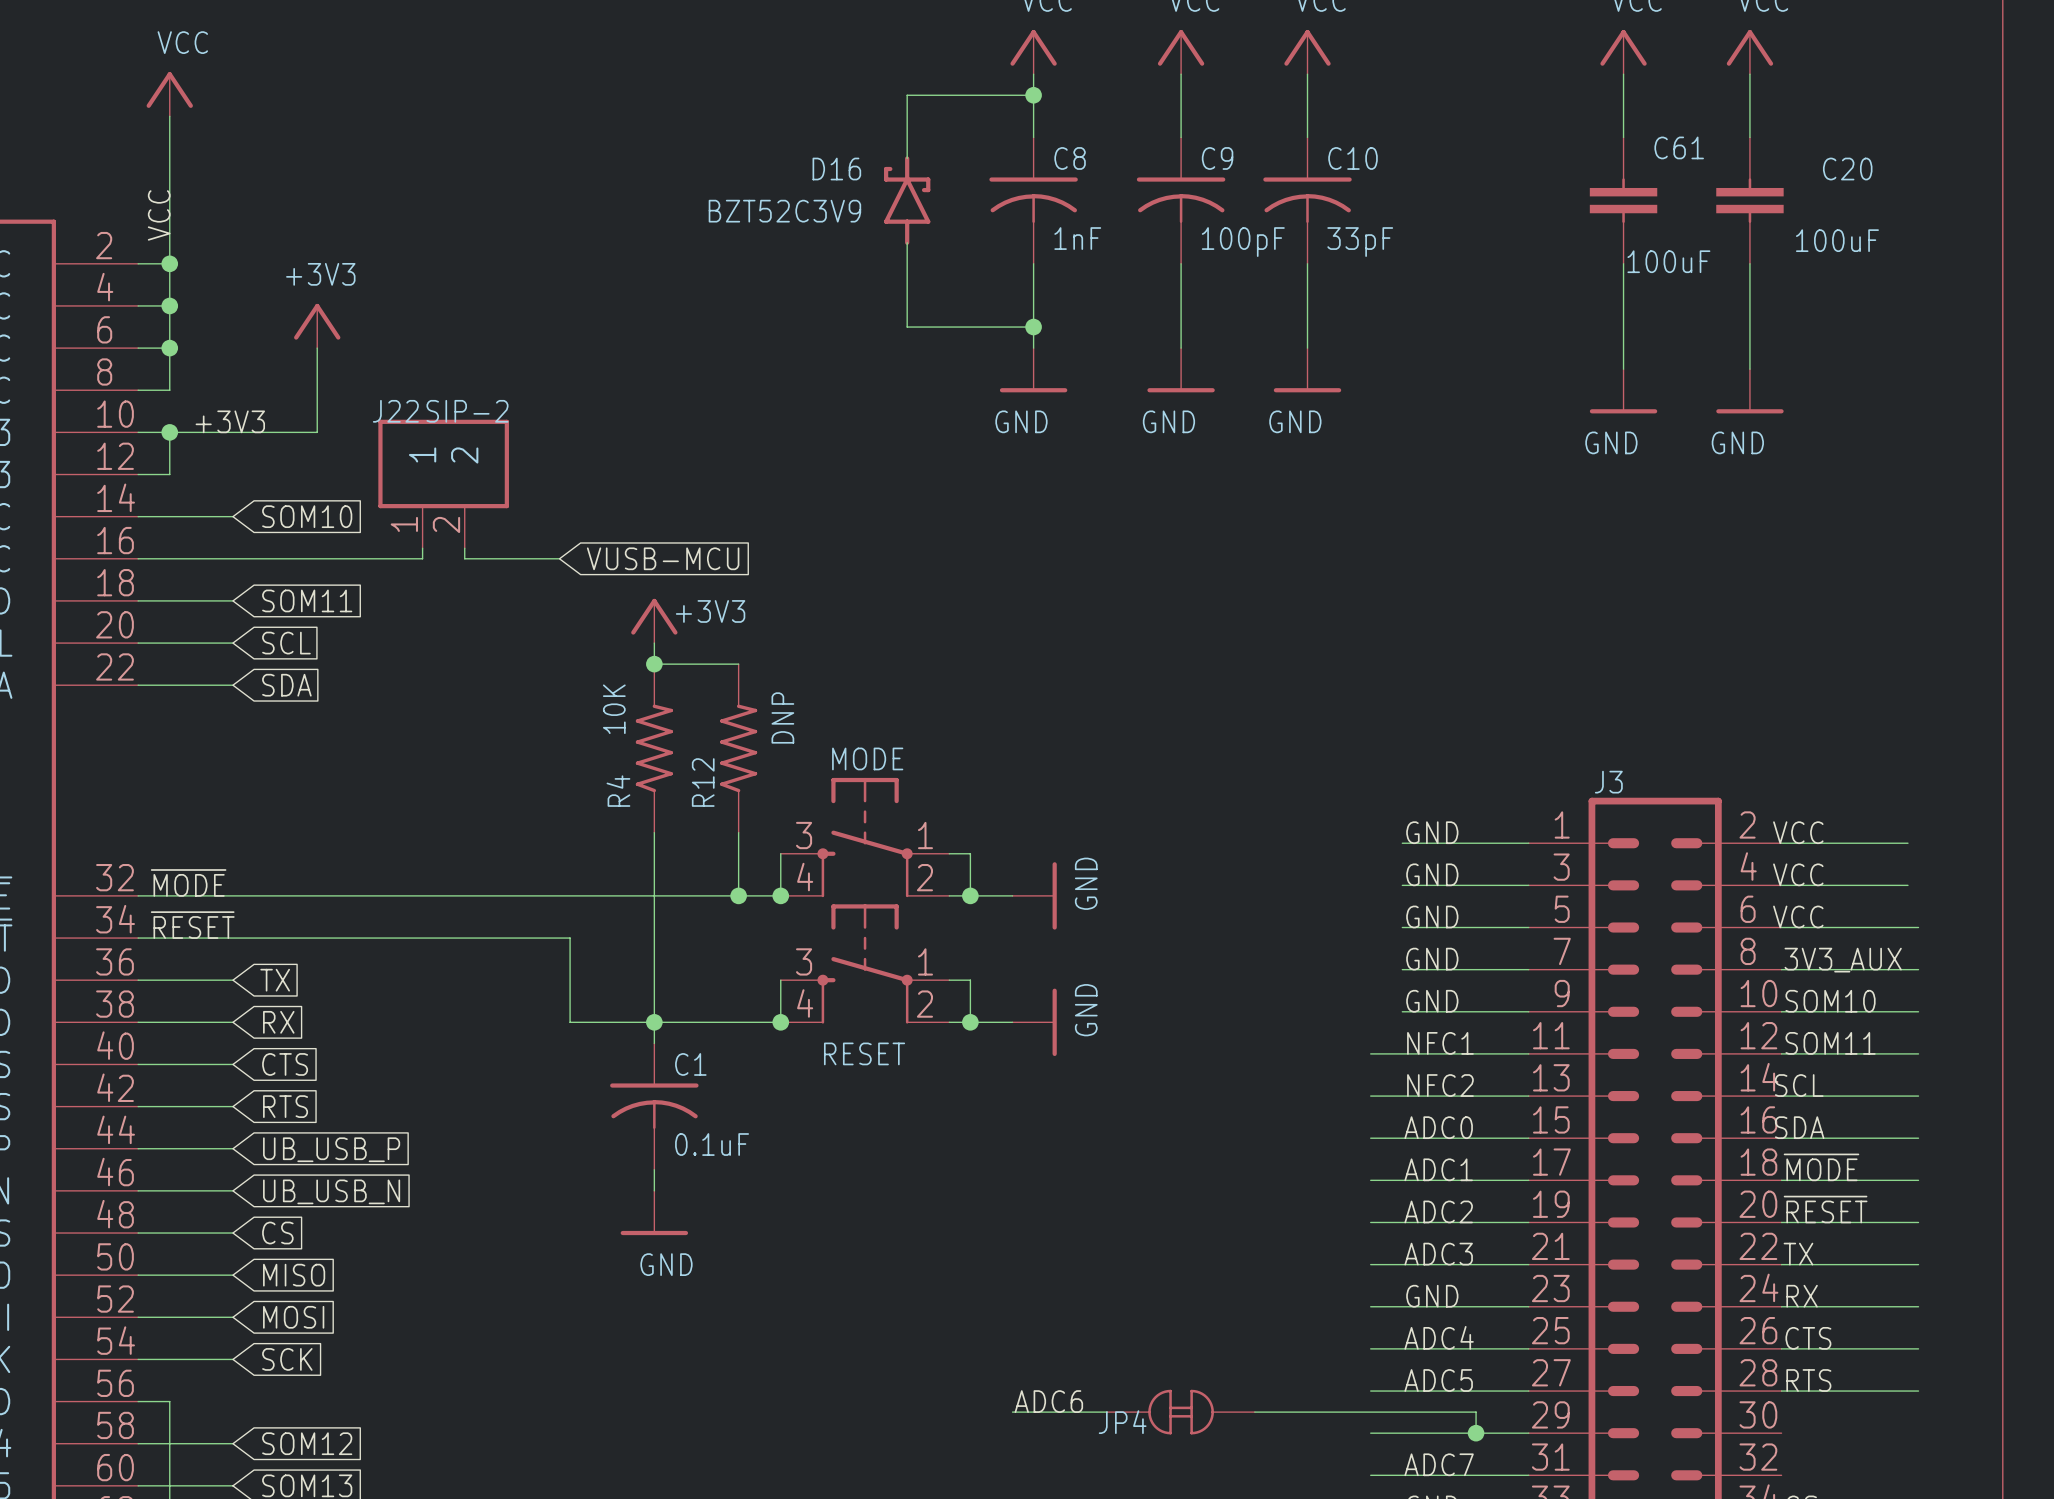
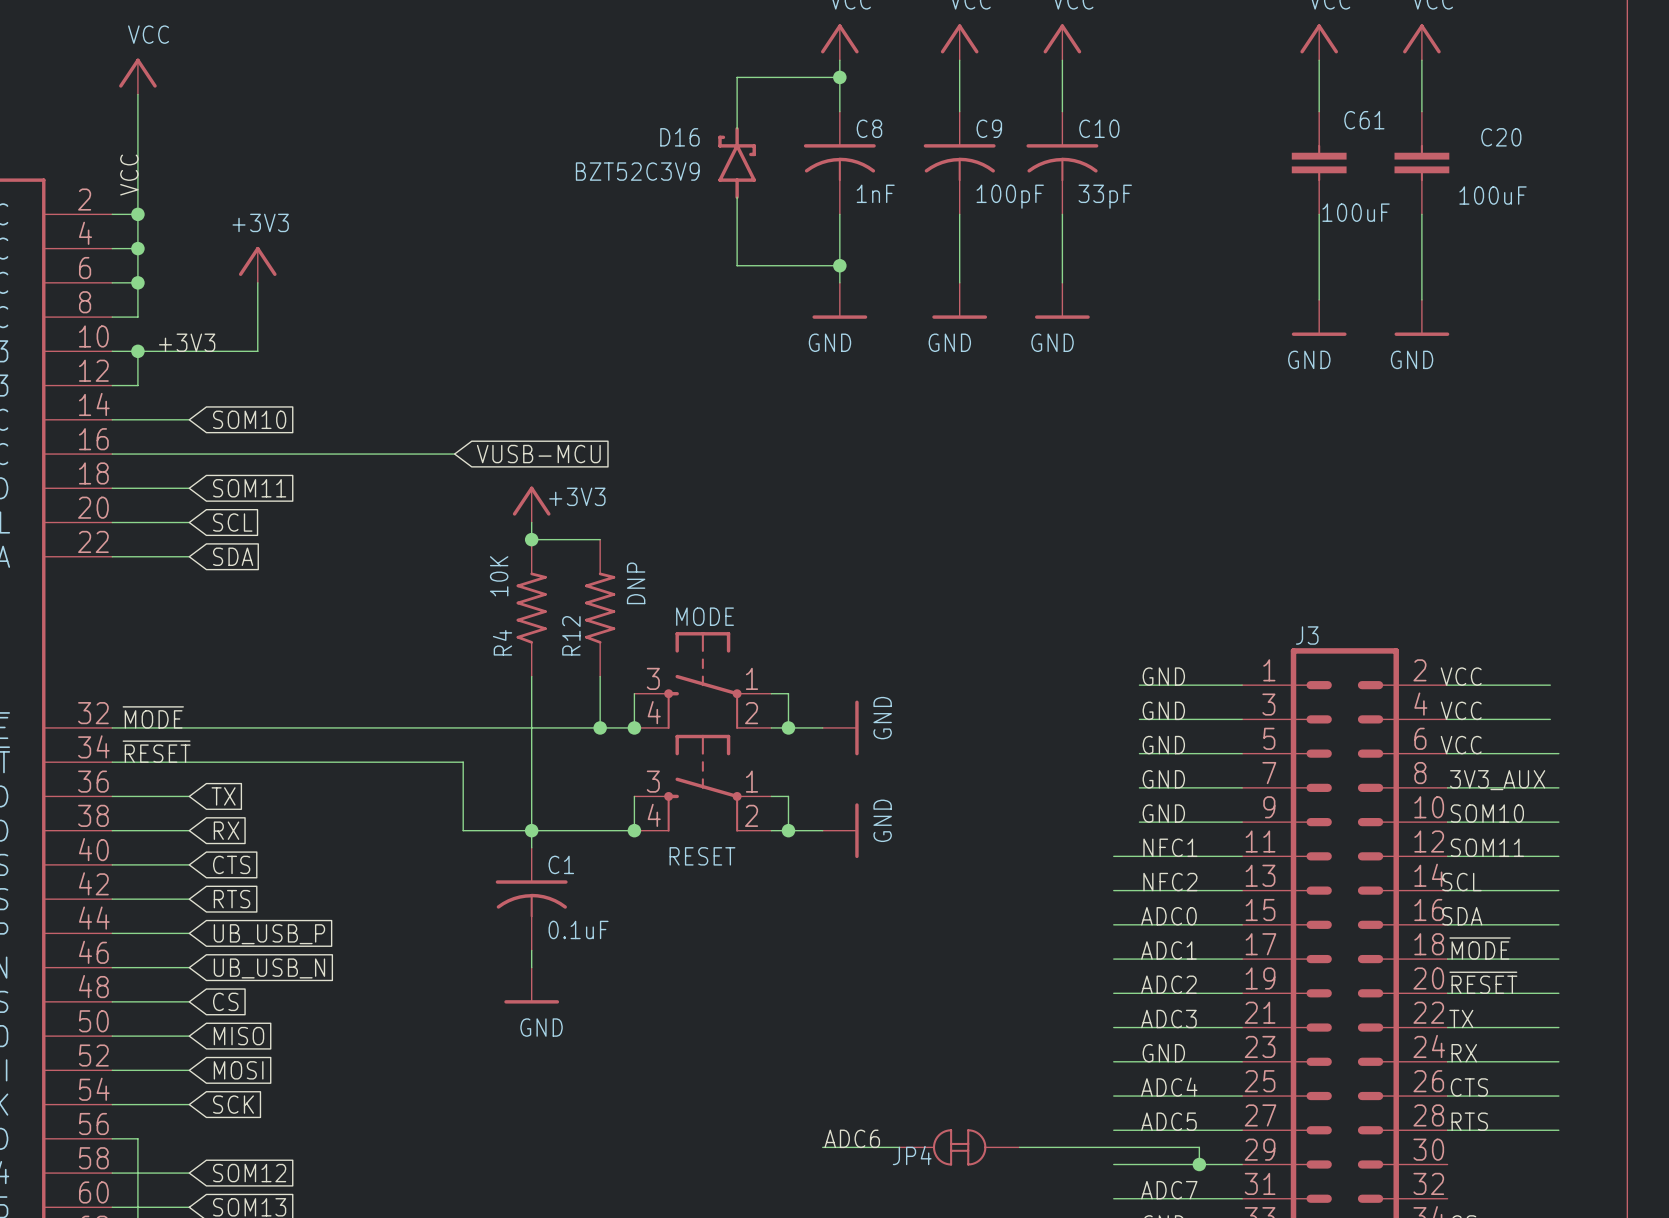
J22: SIP-2 (443, 484) -> none
wire: (422, 548) (422, 558) -> (377, 454) (343, 454)
wire: (464, 548) (464, 558) -> none

